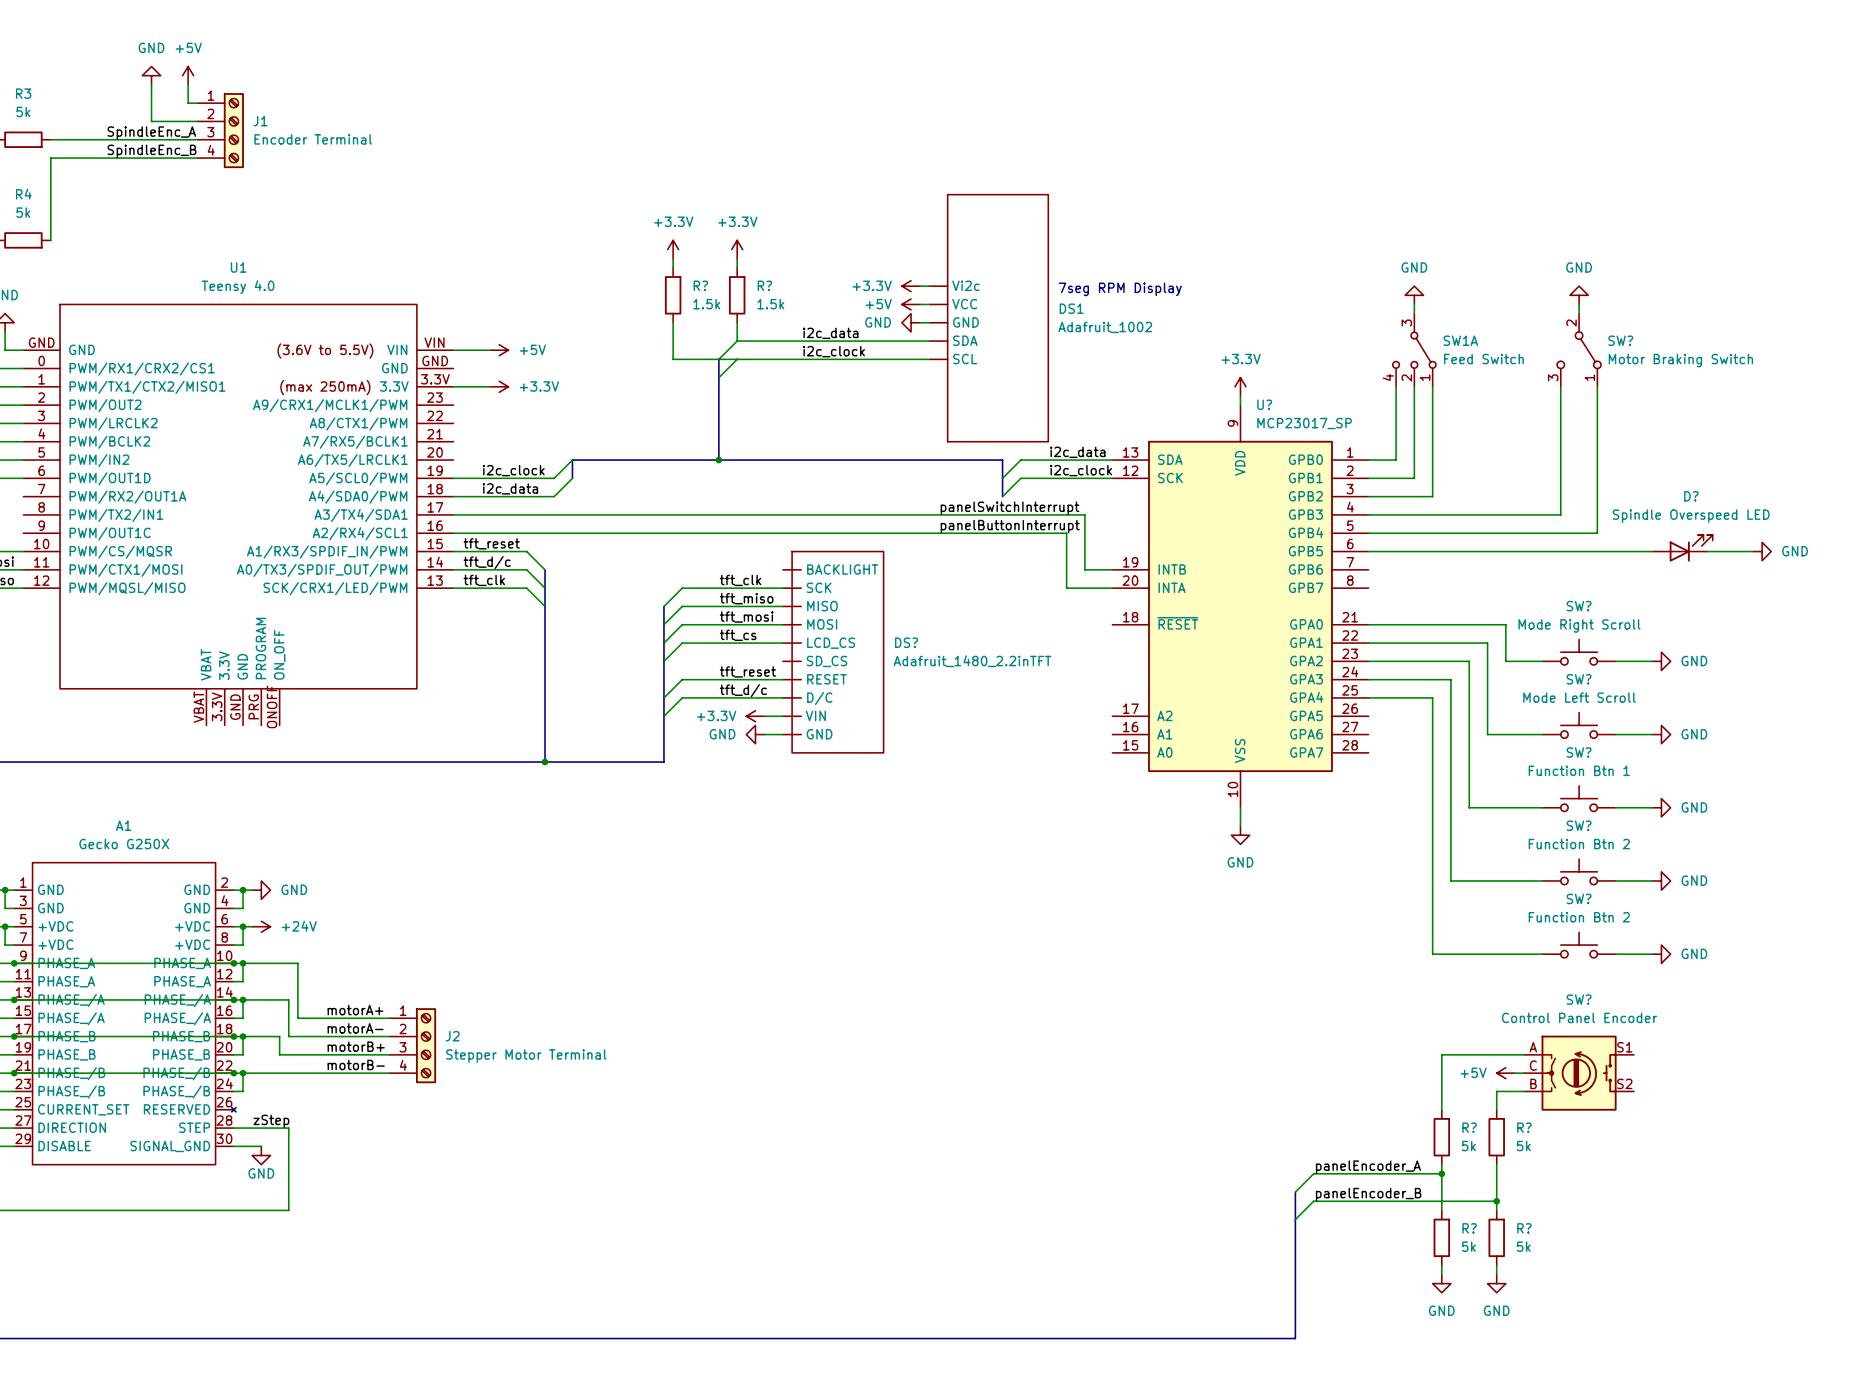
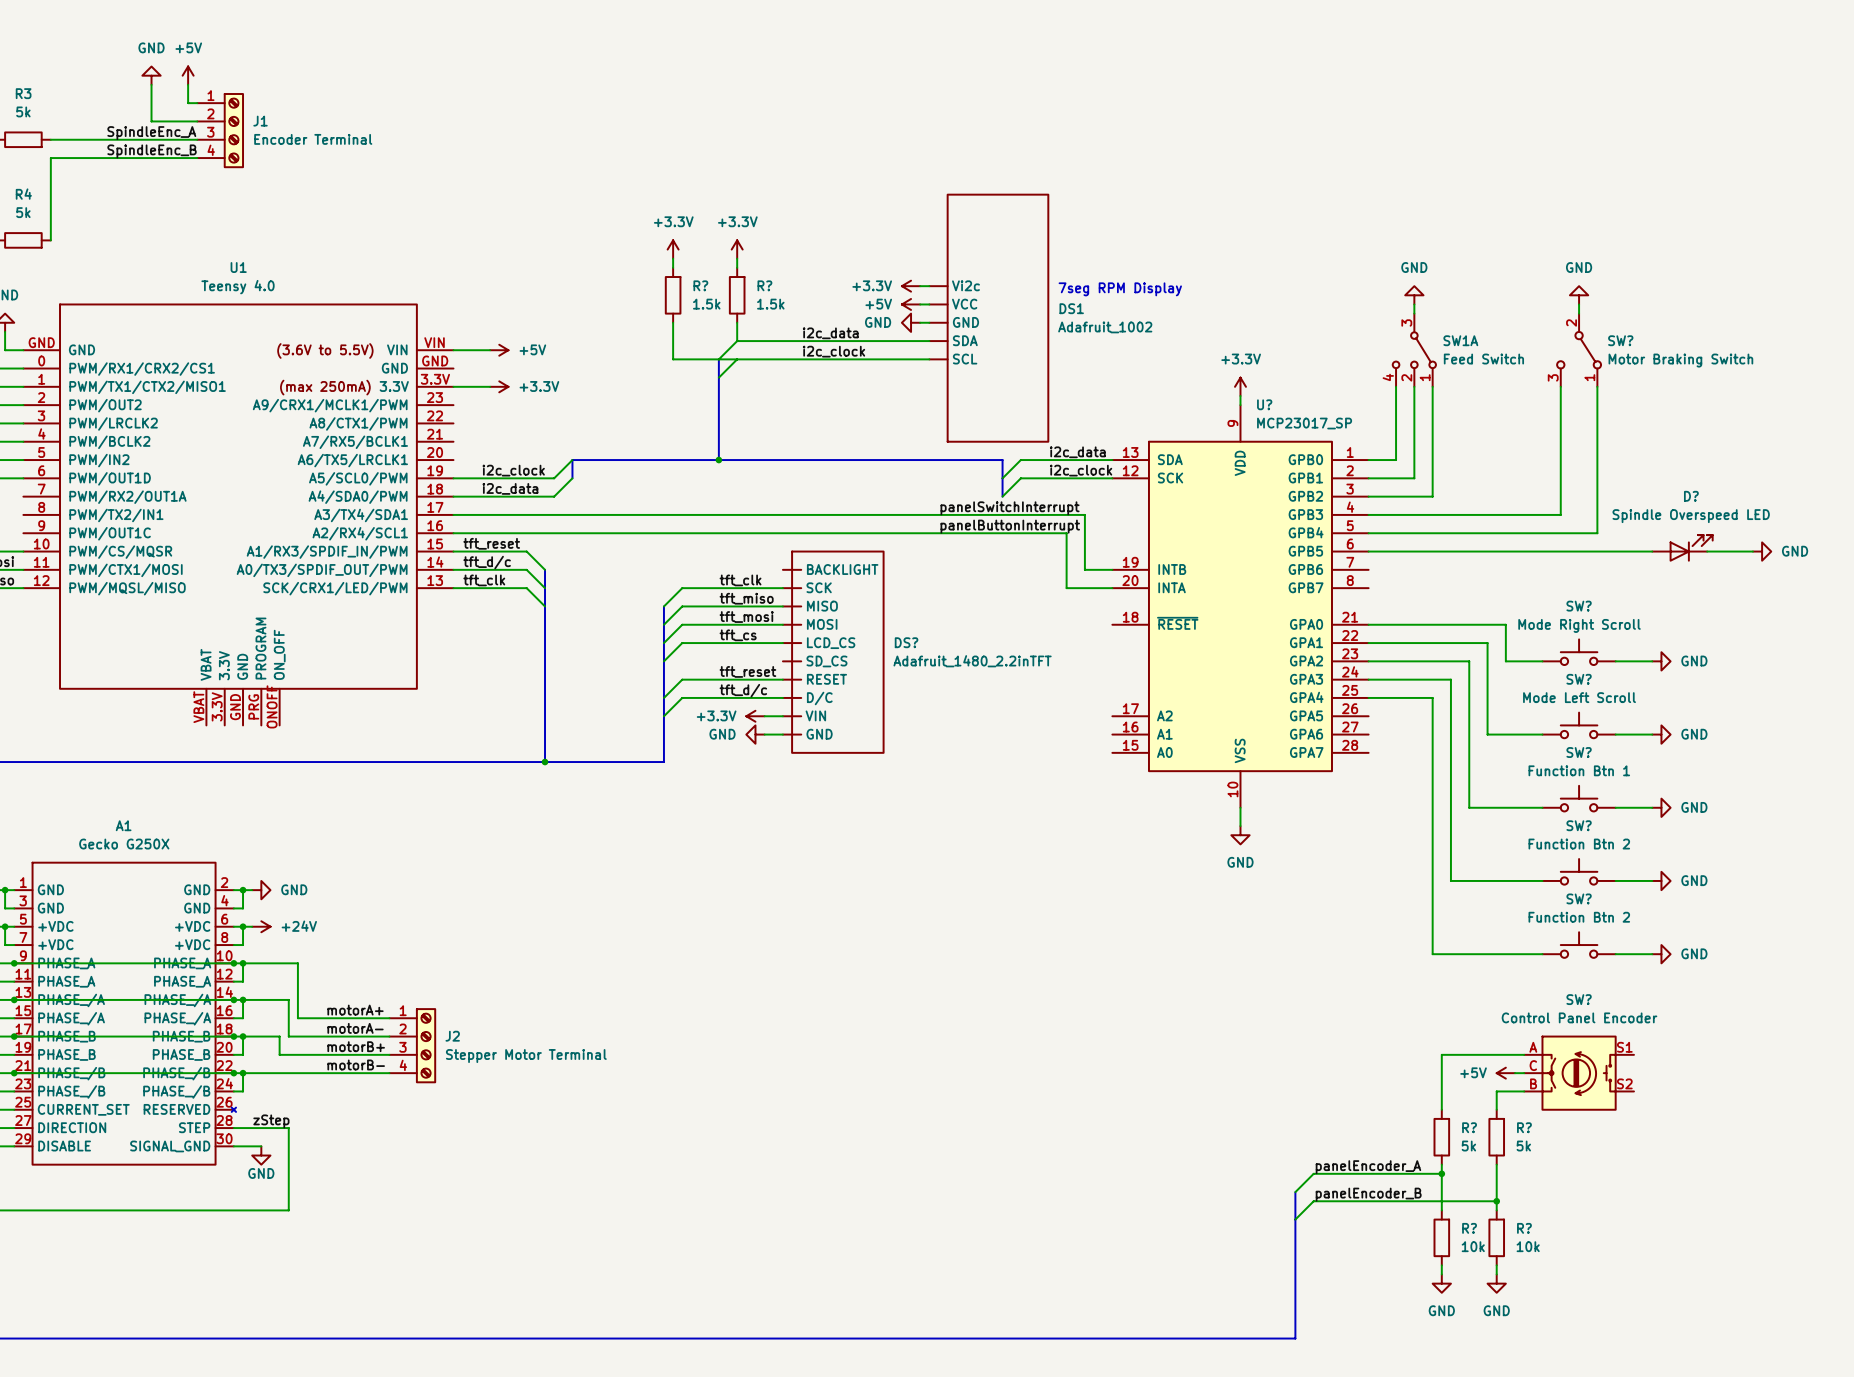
R? value: 5k (1468, 1246) -> 10k (1473, 1246)
R? value: 5k (1523, 1246) -> 10k (1528, 1246)

